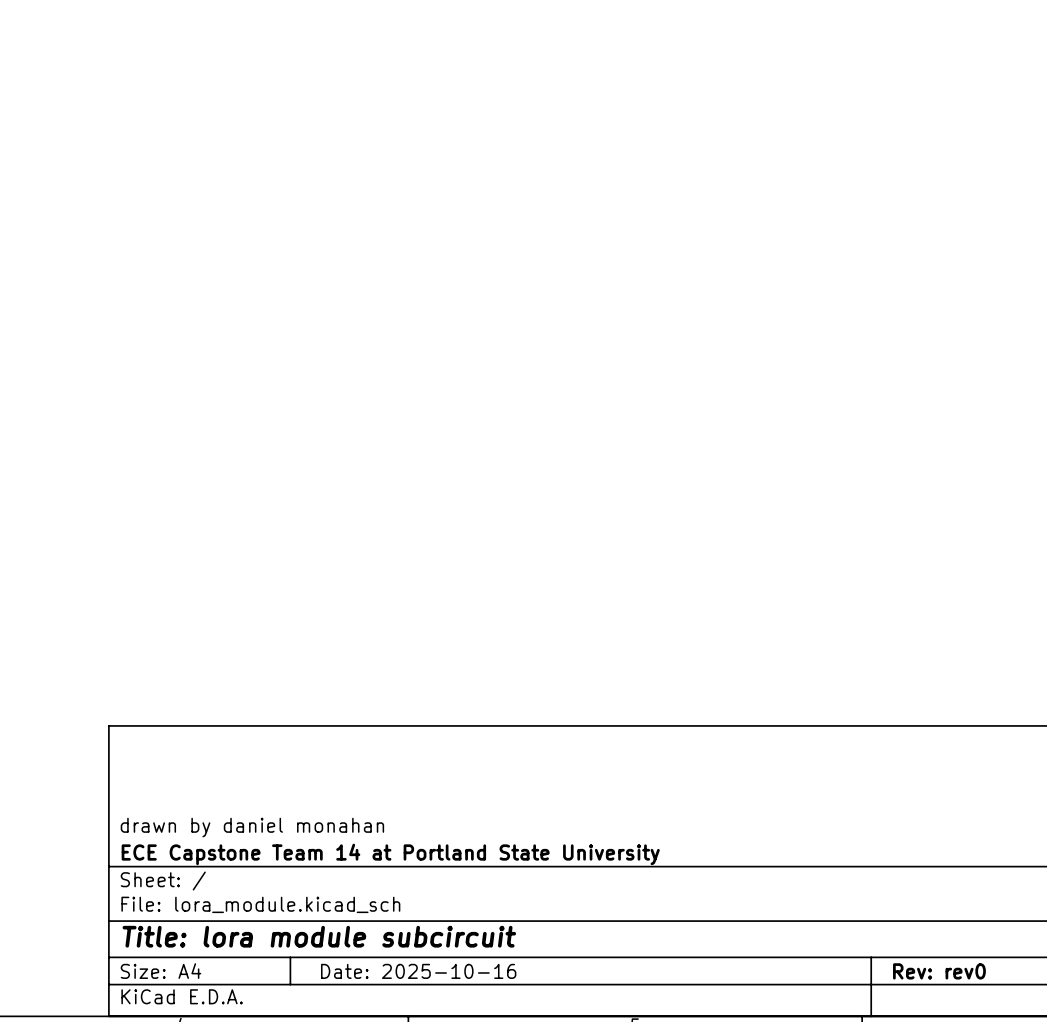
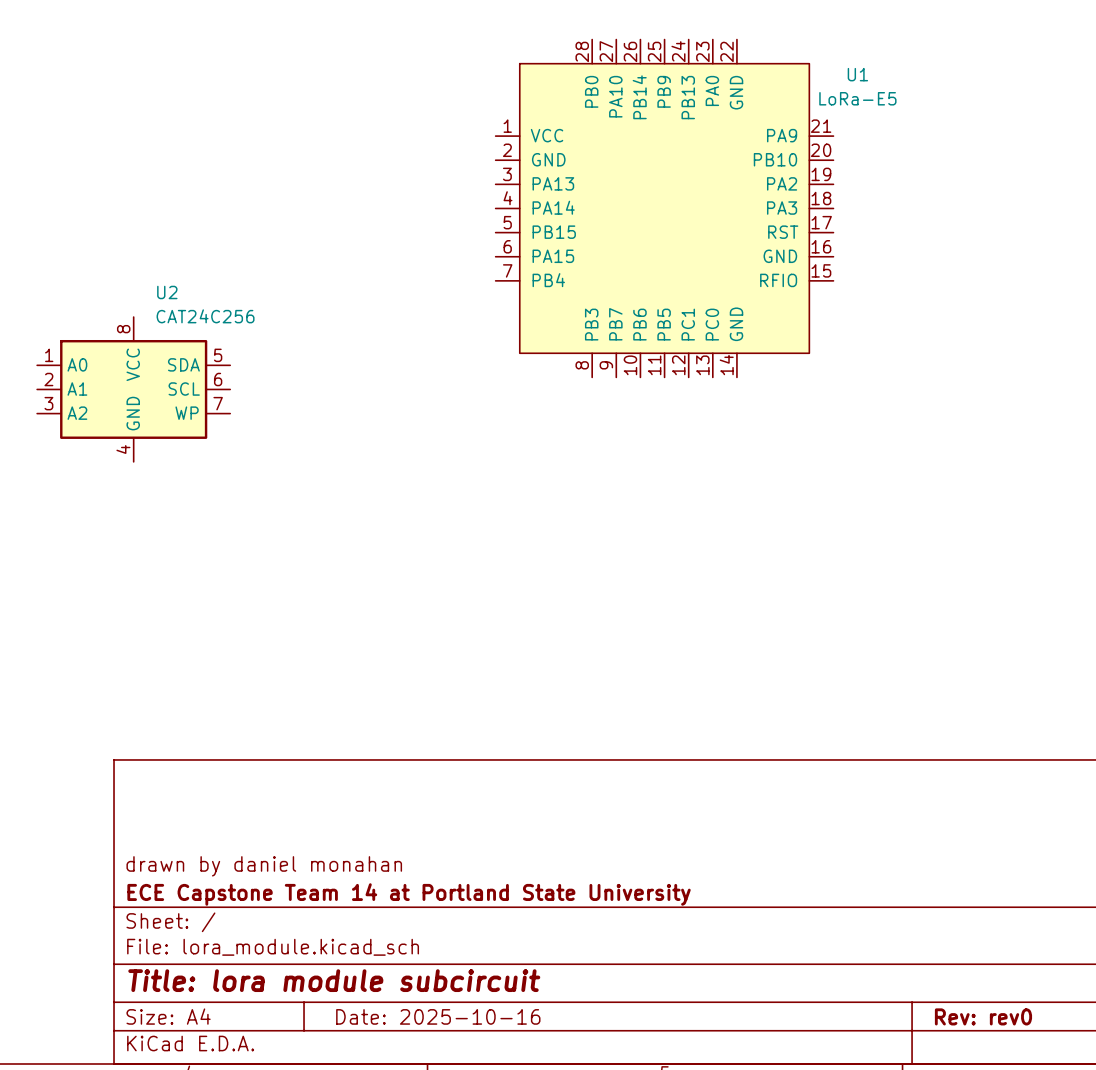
U1: none -> LoRa-E5 (664, 208)
U2: none -> CAT24C256 (133, 389)

